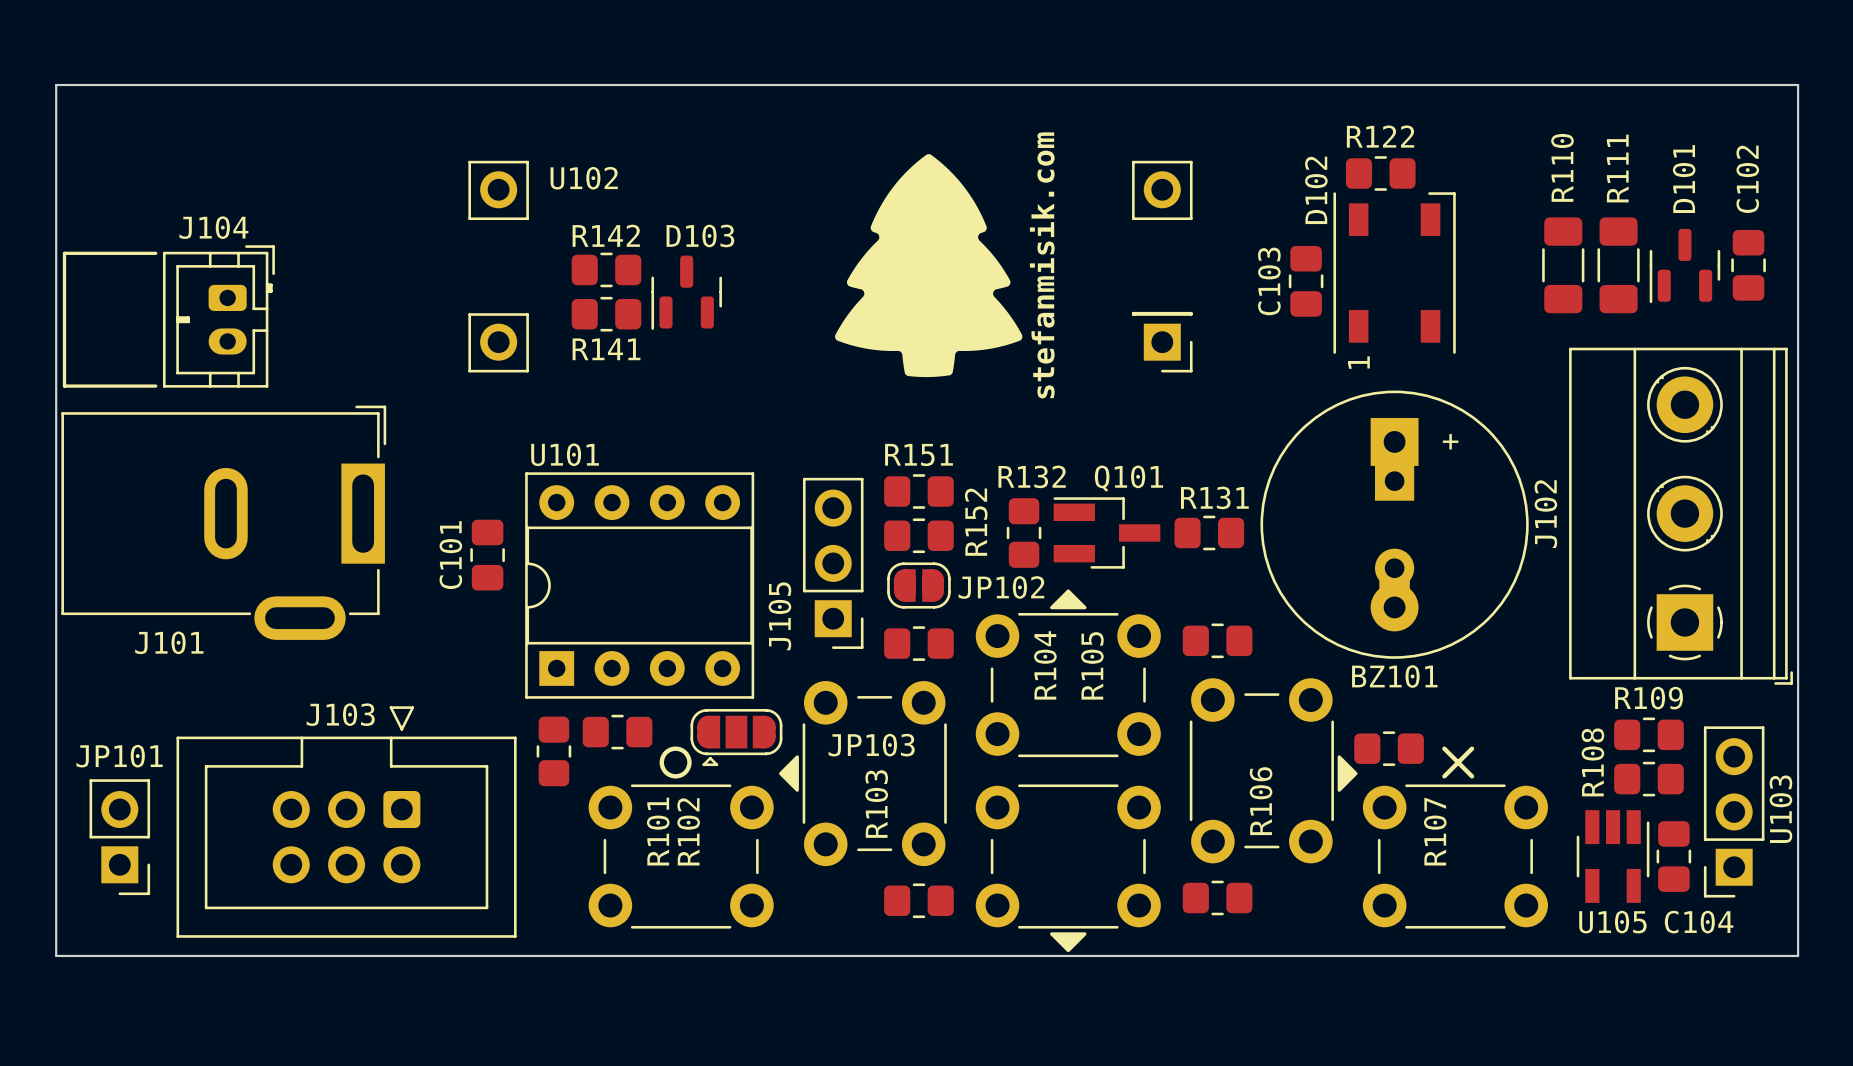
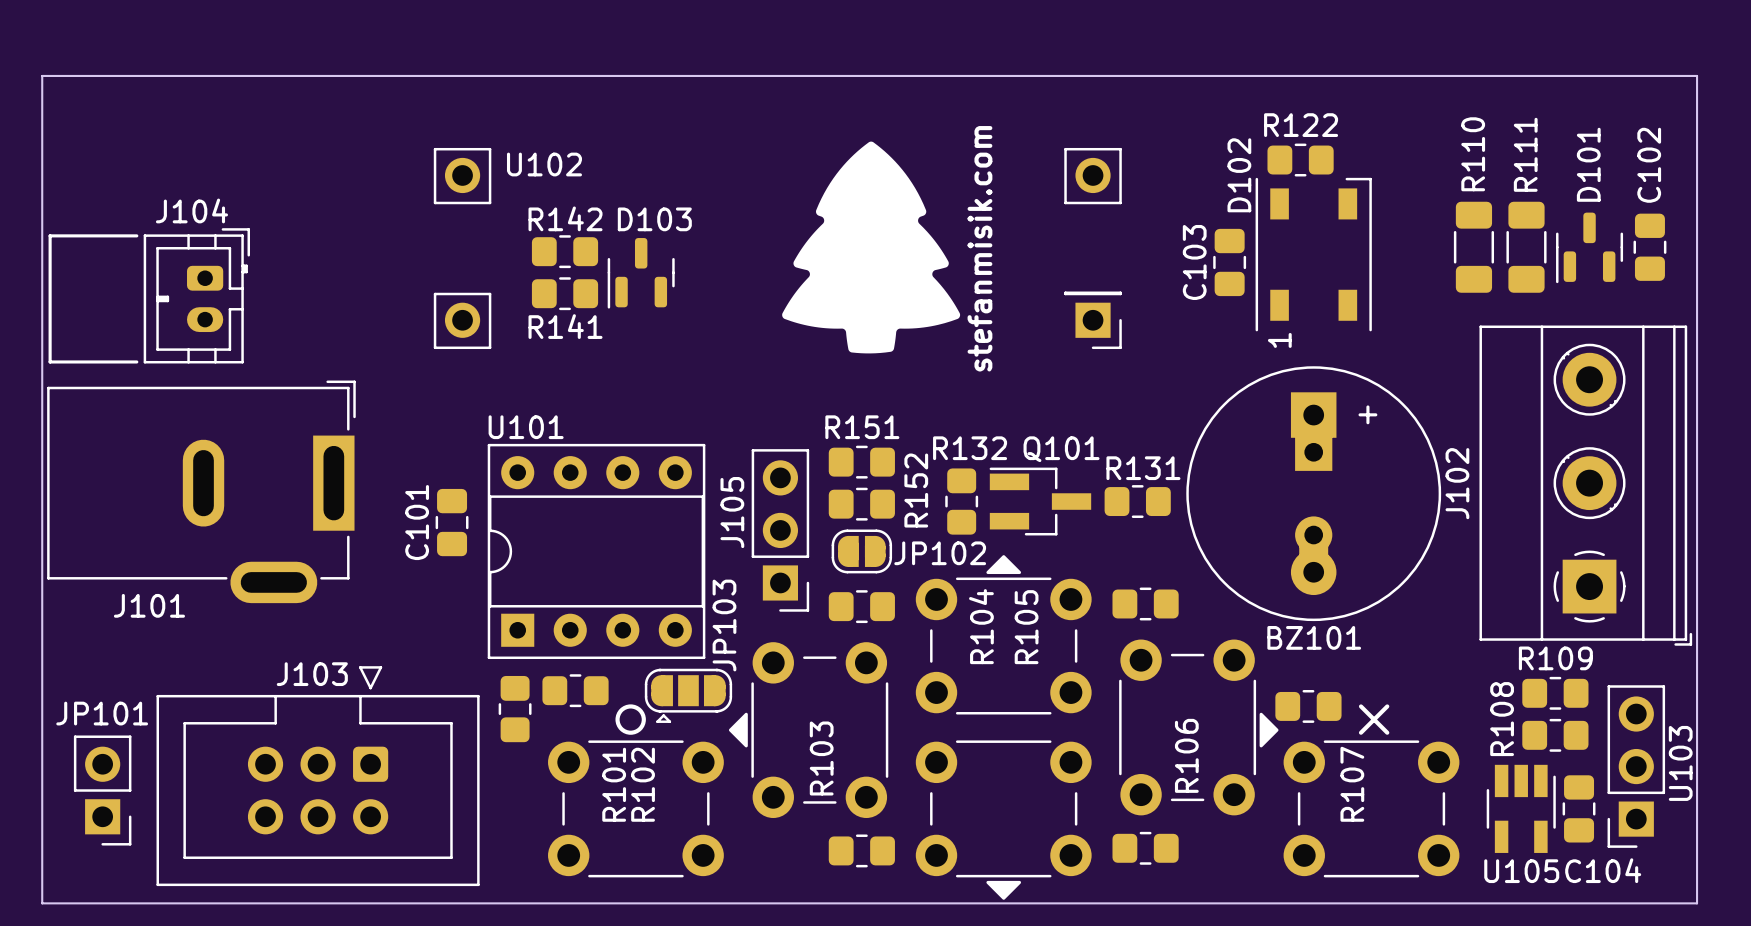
J105 name position: J105 (779, 616) -> J105 (732, 512)
JP103 name rotation: 0° (871, 745) -> 90° counterclockwise (724, 625)
JP103 name position: JP103 (871, 745) -> JP103 (724, 625)

